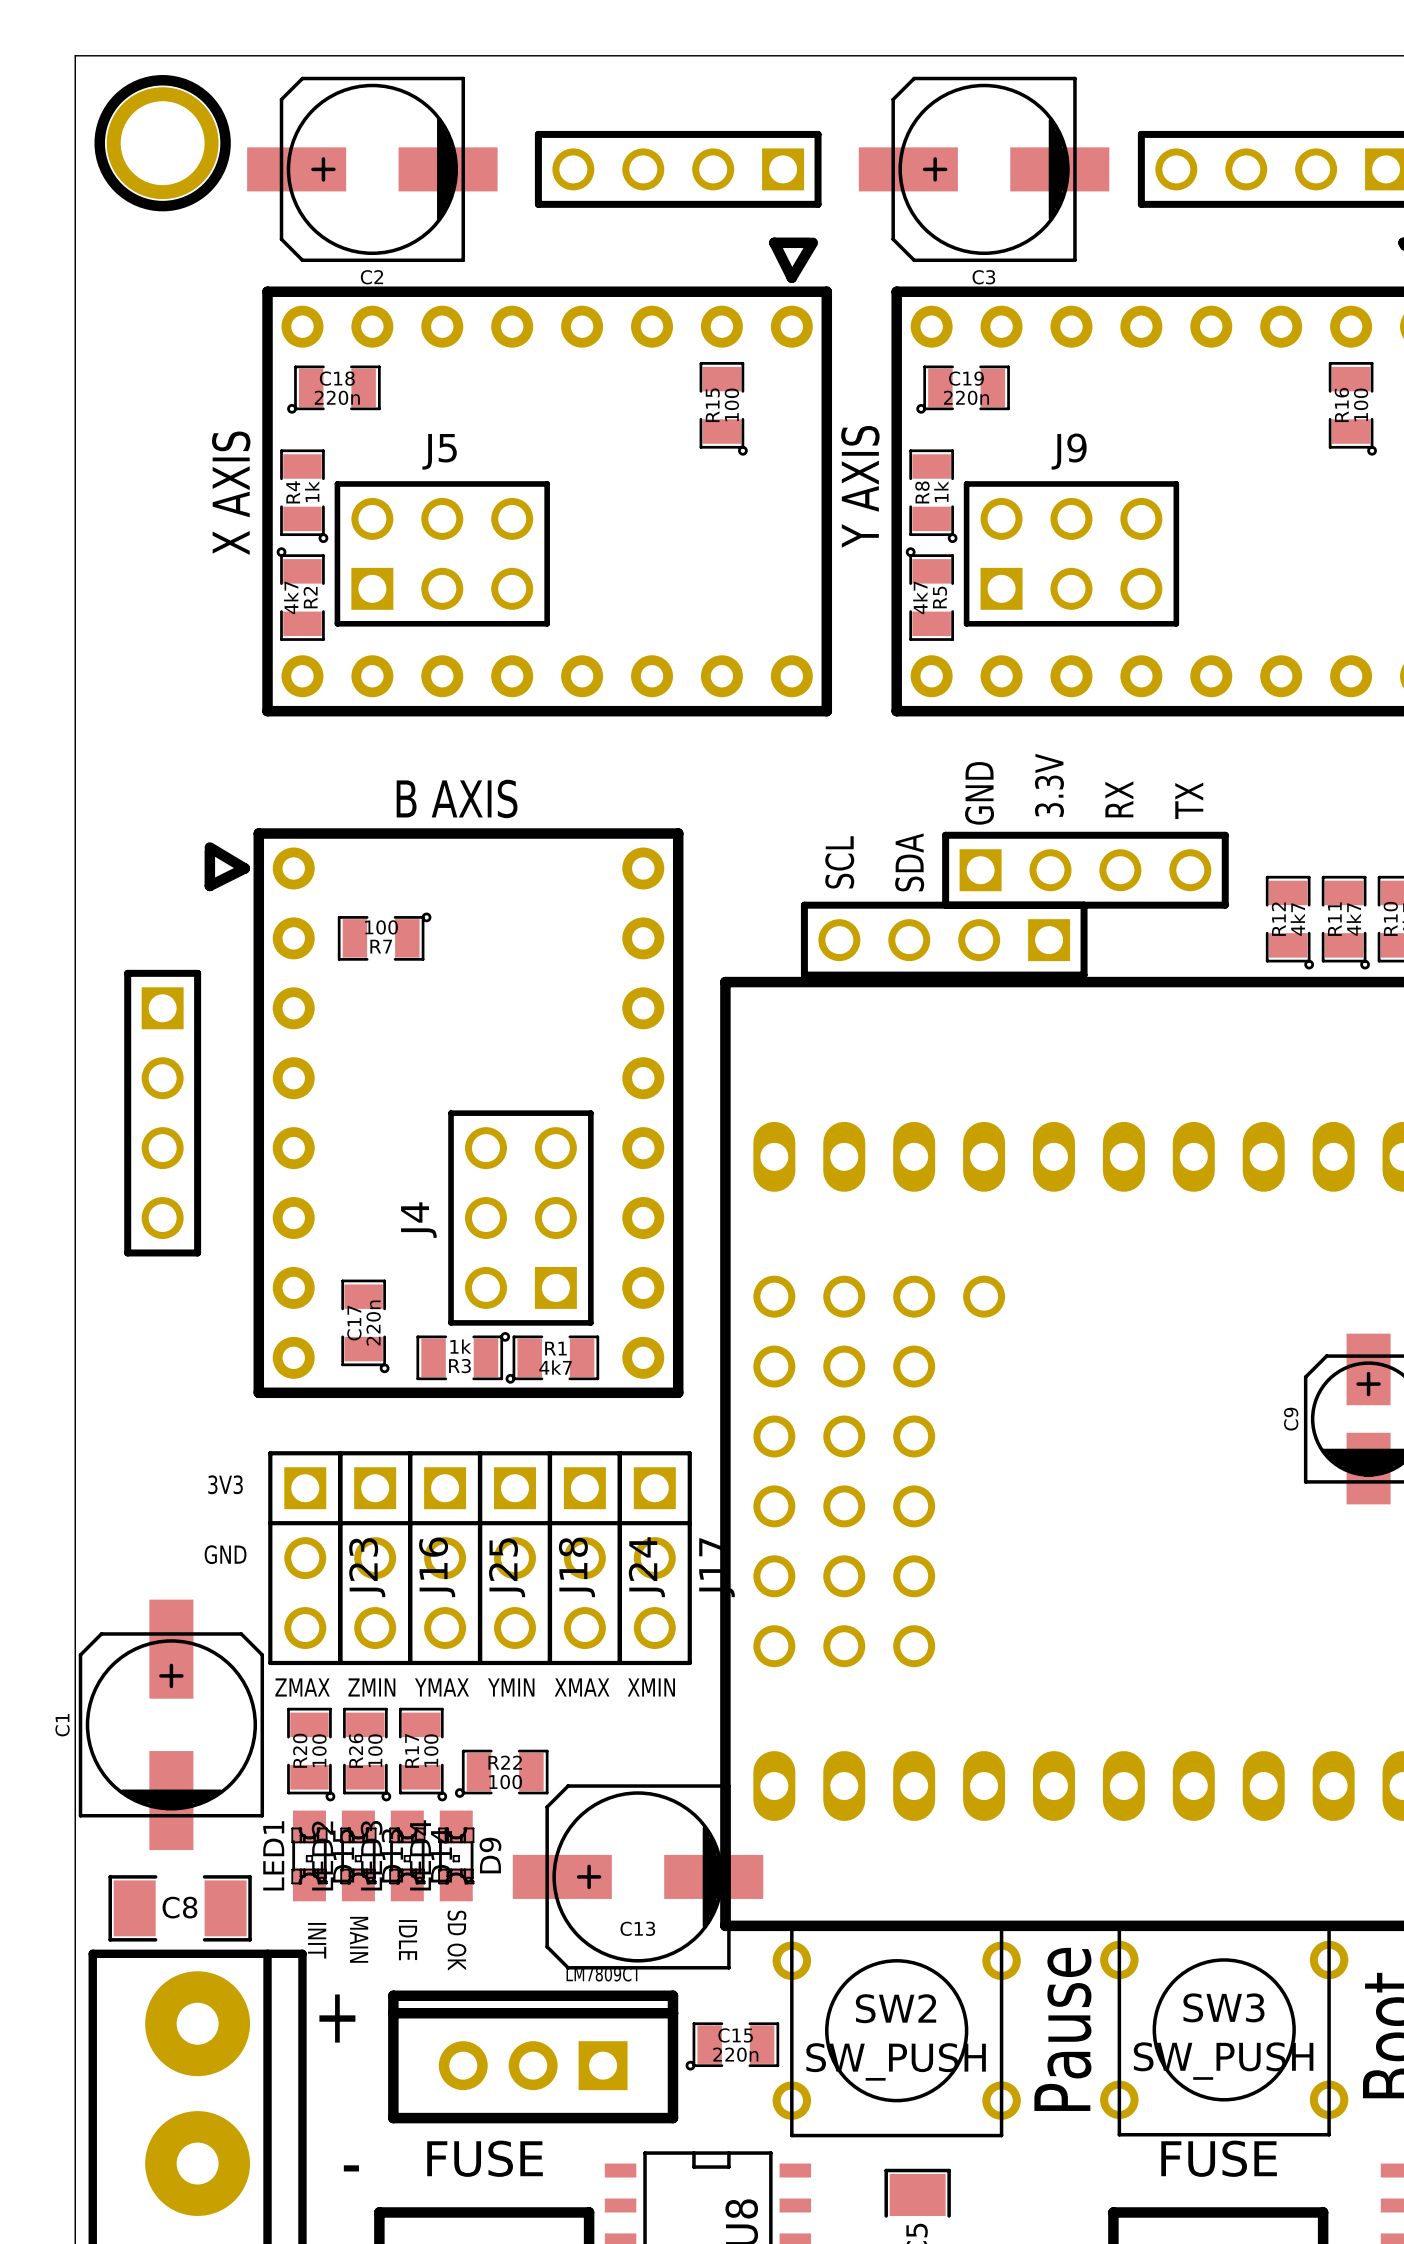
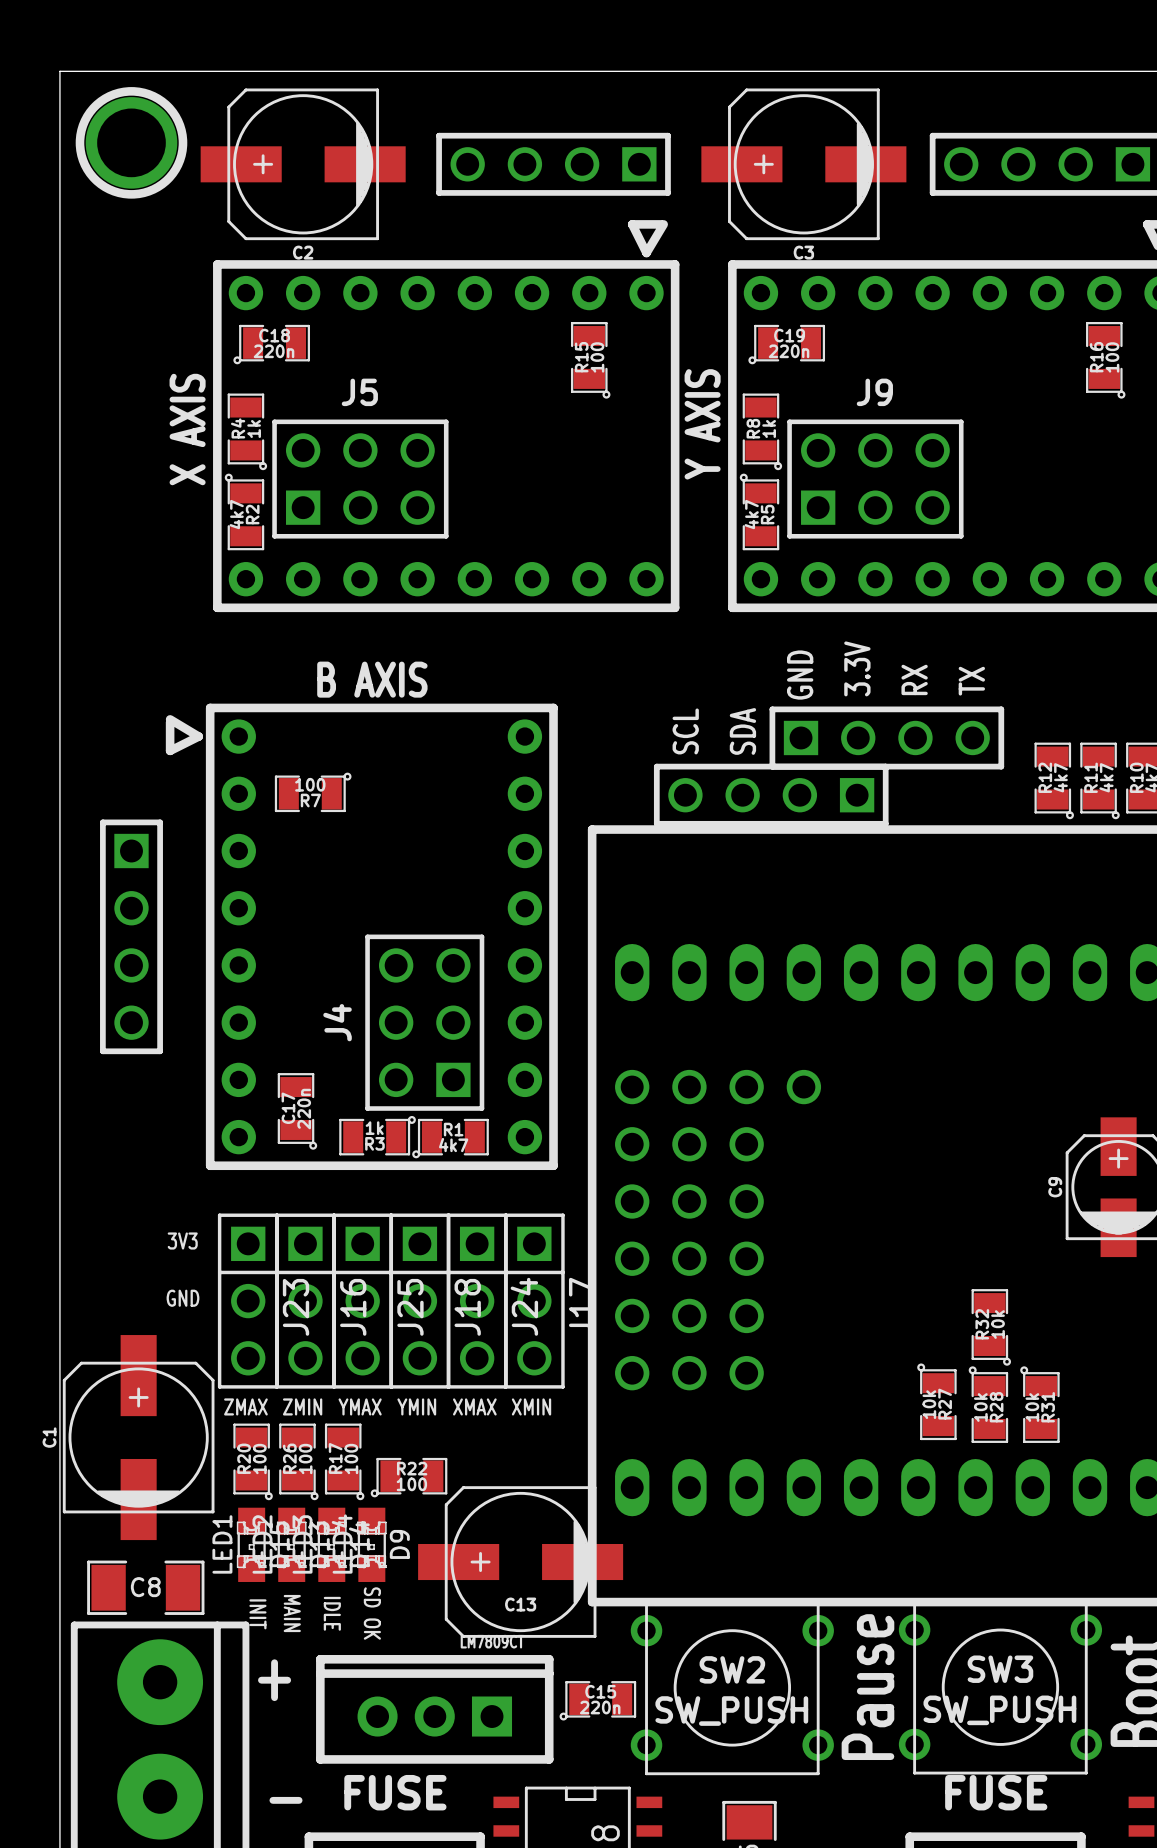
R32: none -> 10k (991, 1327)
R27: none -> 10k (936, 1401)
R28: none -> 10k (988, 1404)
R31: none -> 10k (1039, 1404)

